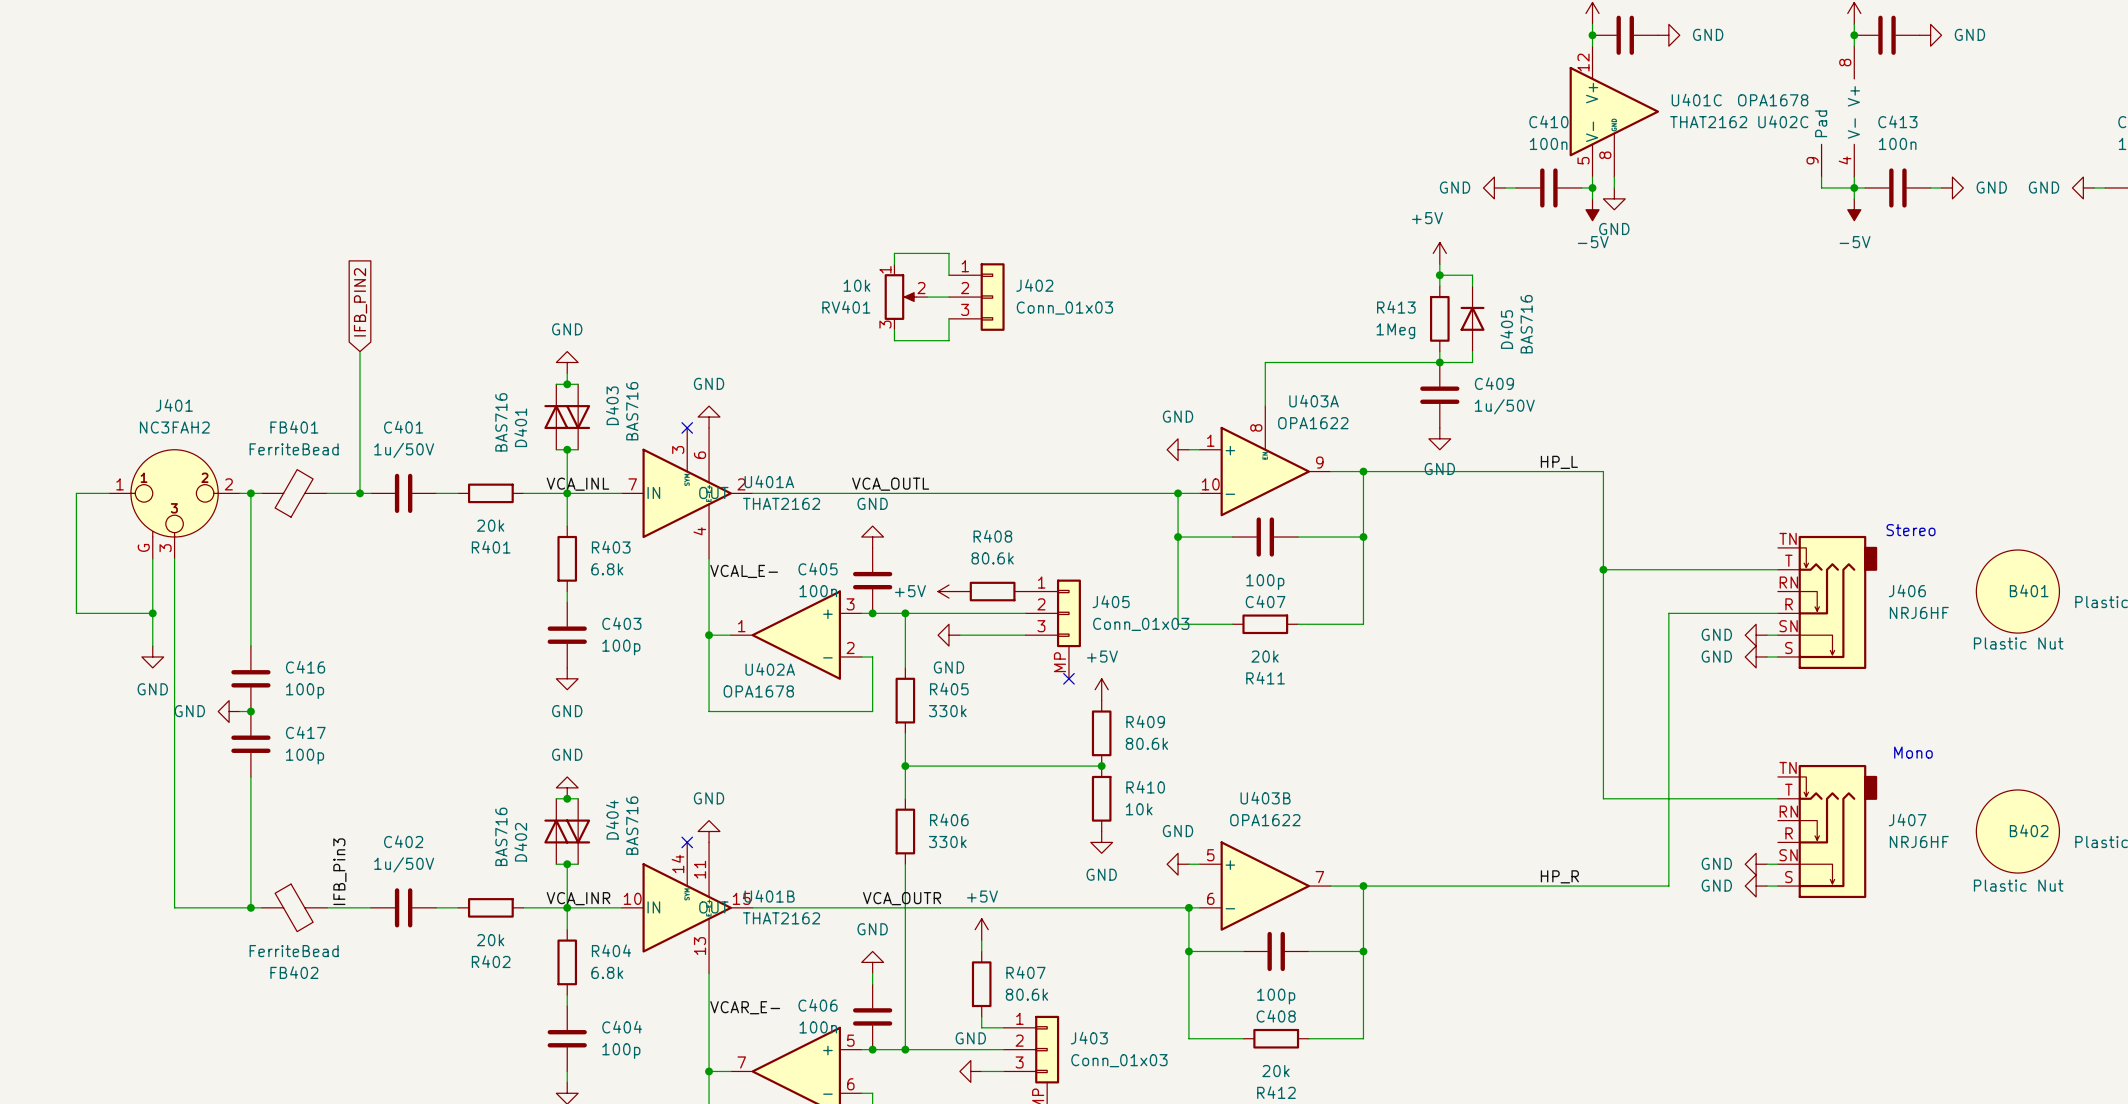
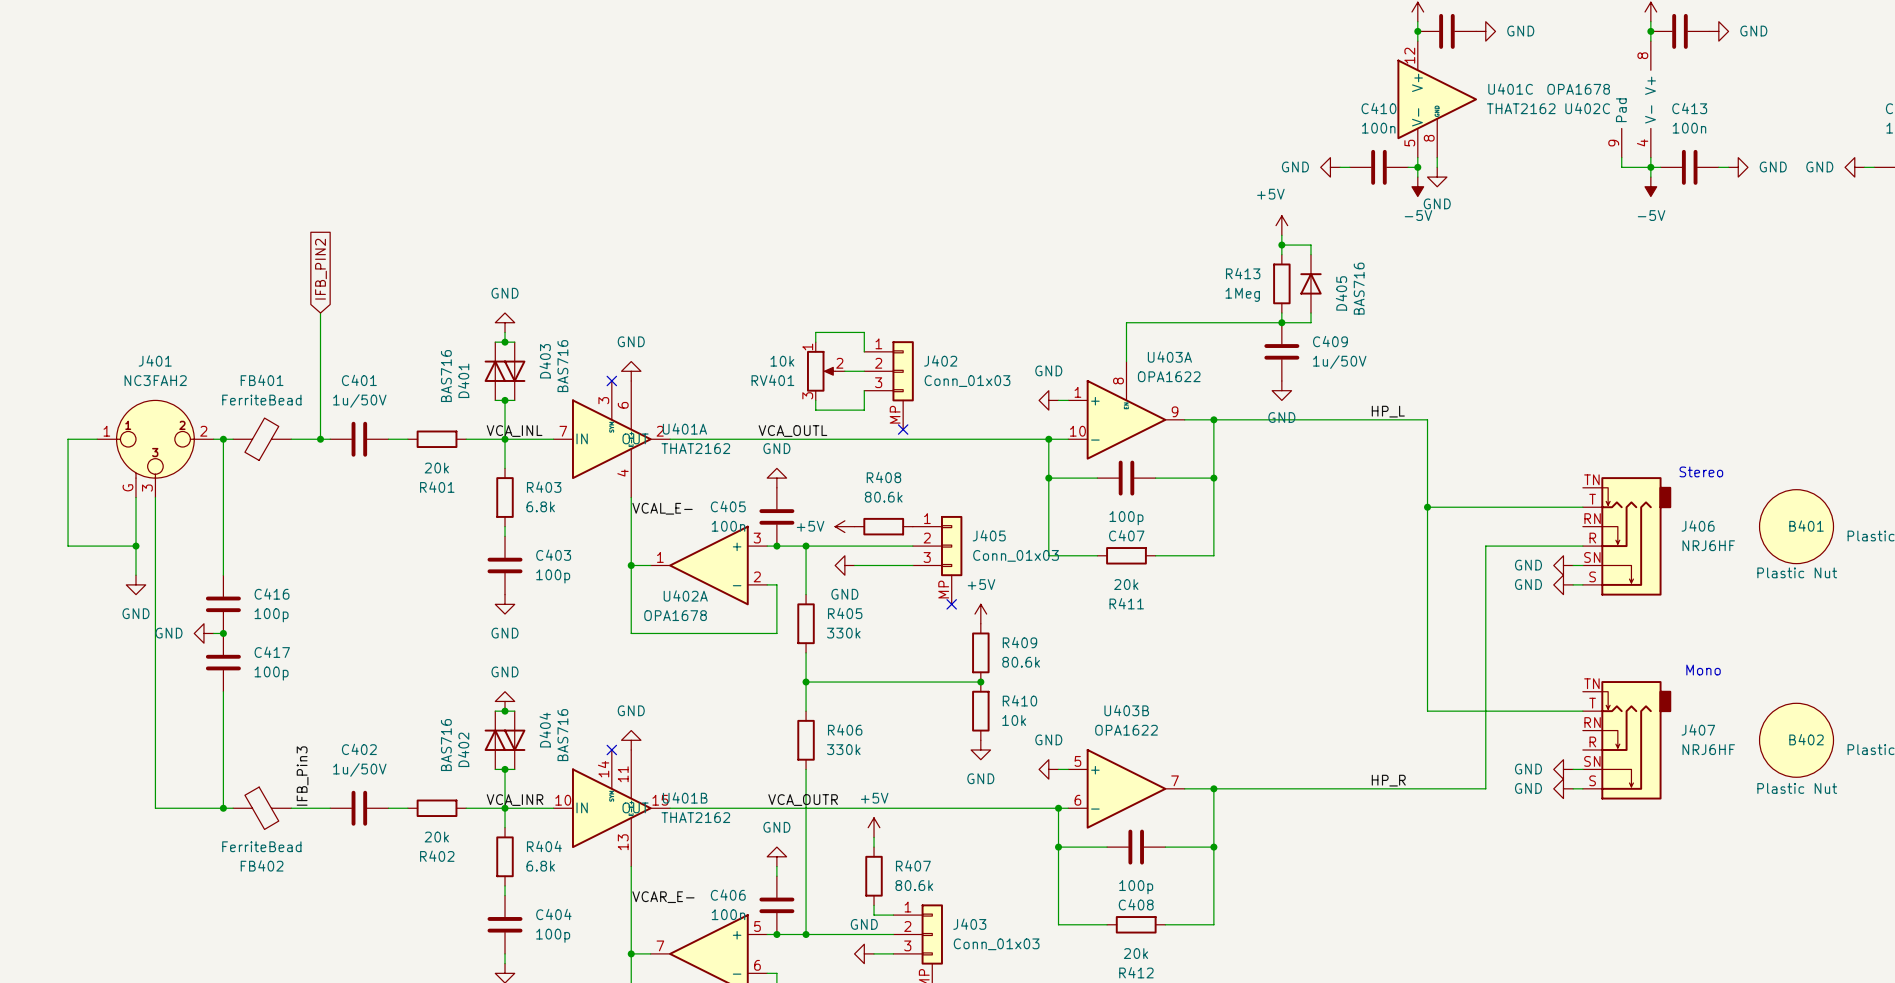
J402 symbol: [948, 263, 1005, 331] -> [864, 341, 914, 430]
wire: (894, 264) (894, 253) (948, 253) (948, 275) -> (815, 342) (815, 332) (864, 332) (864, 351)
RV401 position: (905, 297) -> (825, 371)
wire: (927, 297) (948, 297) -> (844, 371) (864, 371)
wire: (948, 318) (948, 340) (894, 340) (894, 329) -> (864, 390) (864, 410) (815, 410) (815, 400)
no-connect mark: none -> (903, 429)

